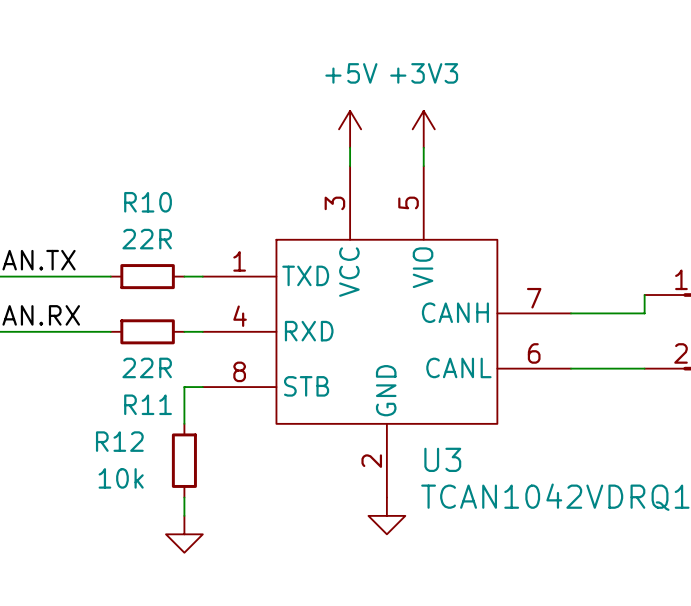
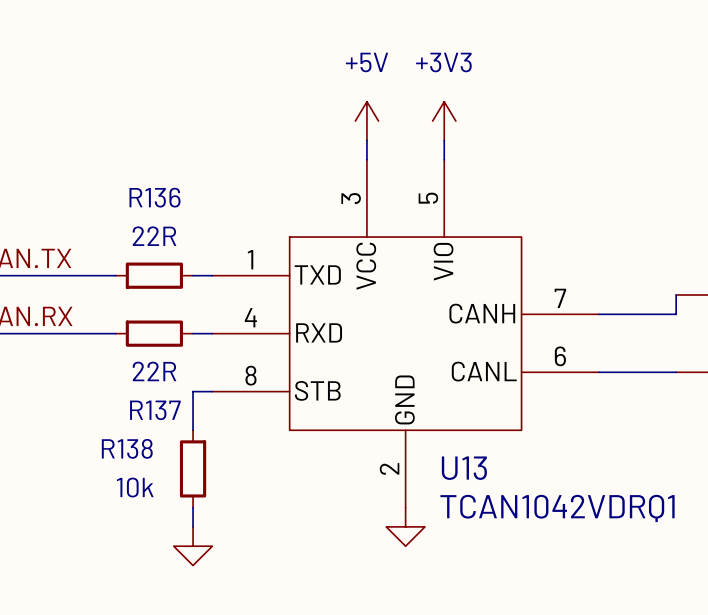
R10 name: R10 (148, 202) -> R136 (155, 197)
R11 name: R11 (148, 404) -> R137 (155, 410)
R12 name: R12 (119, 441) -> R138 (127, 448)
U3 name: U3 (442, 459) -> U13 (464, 468)

